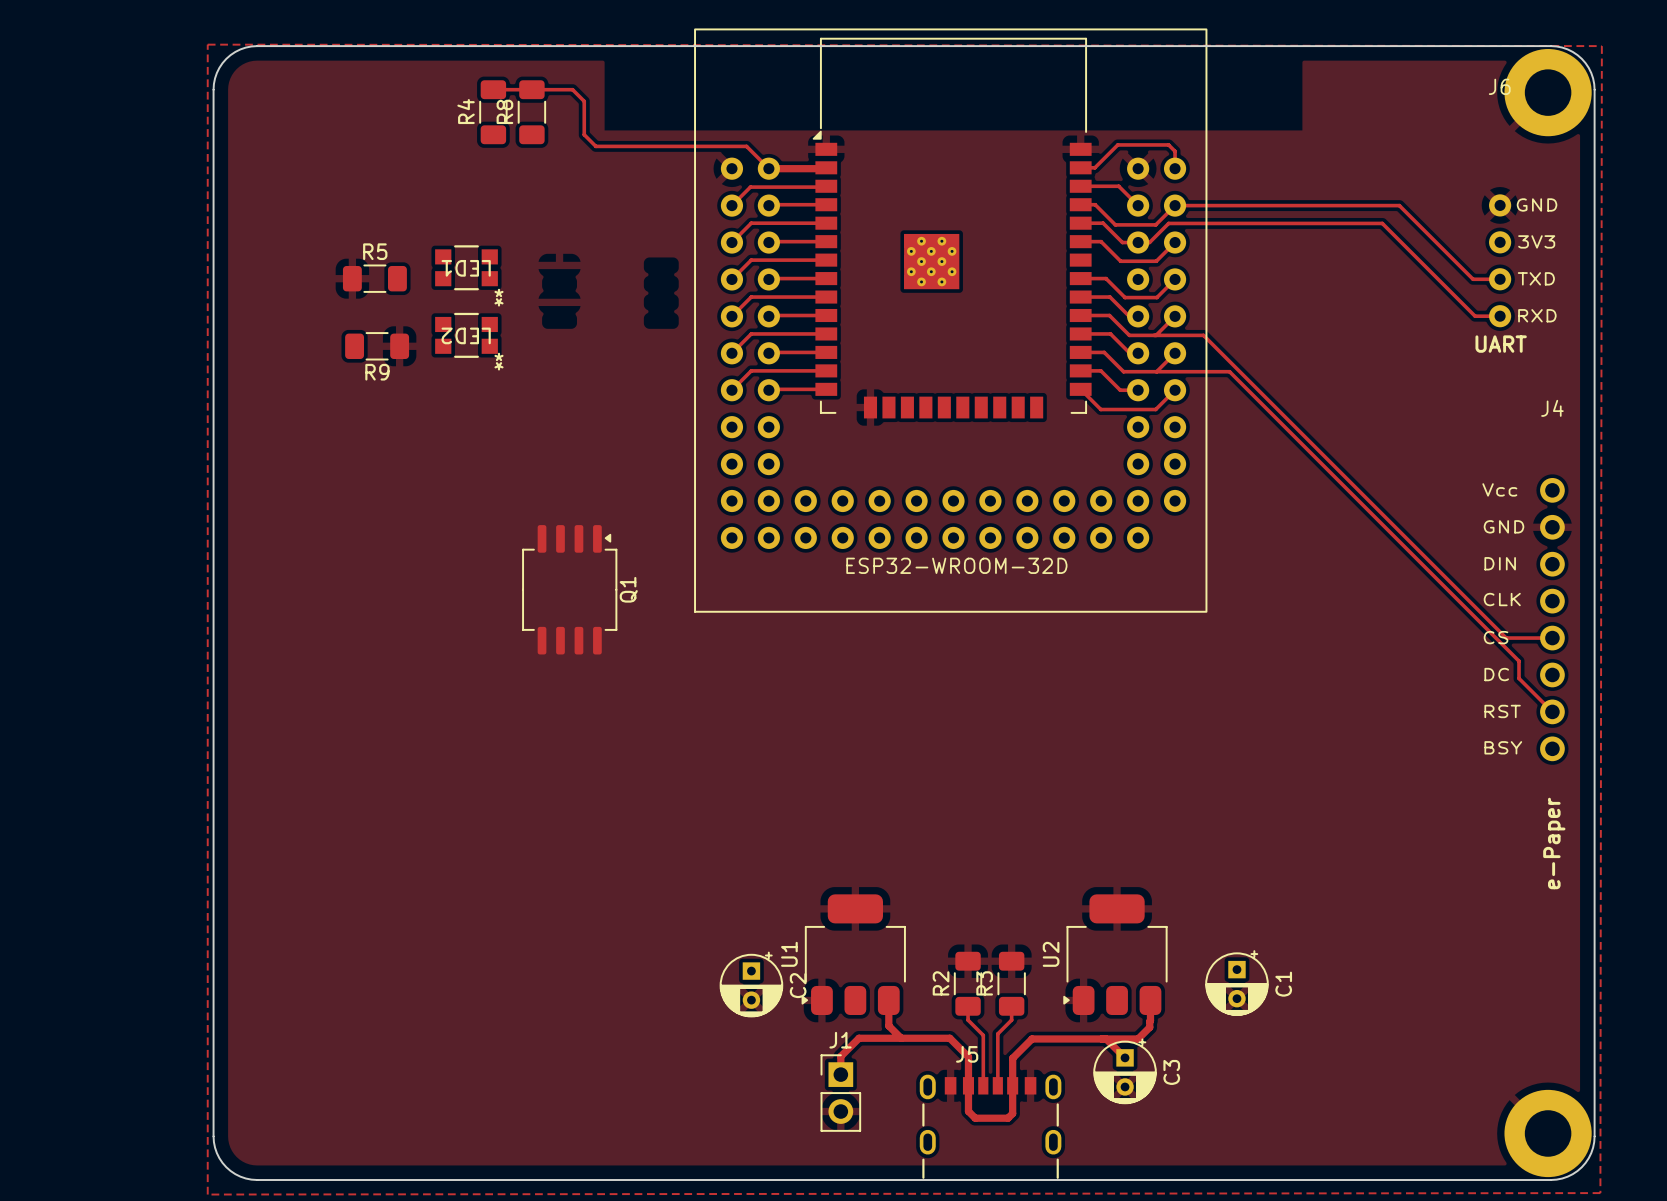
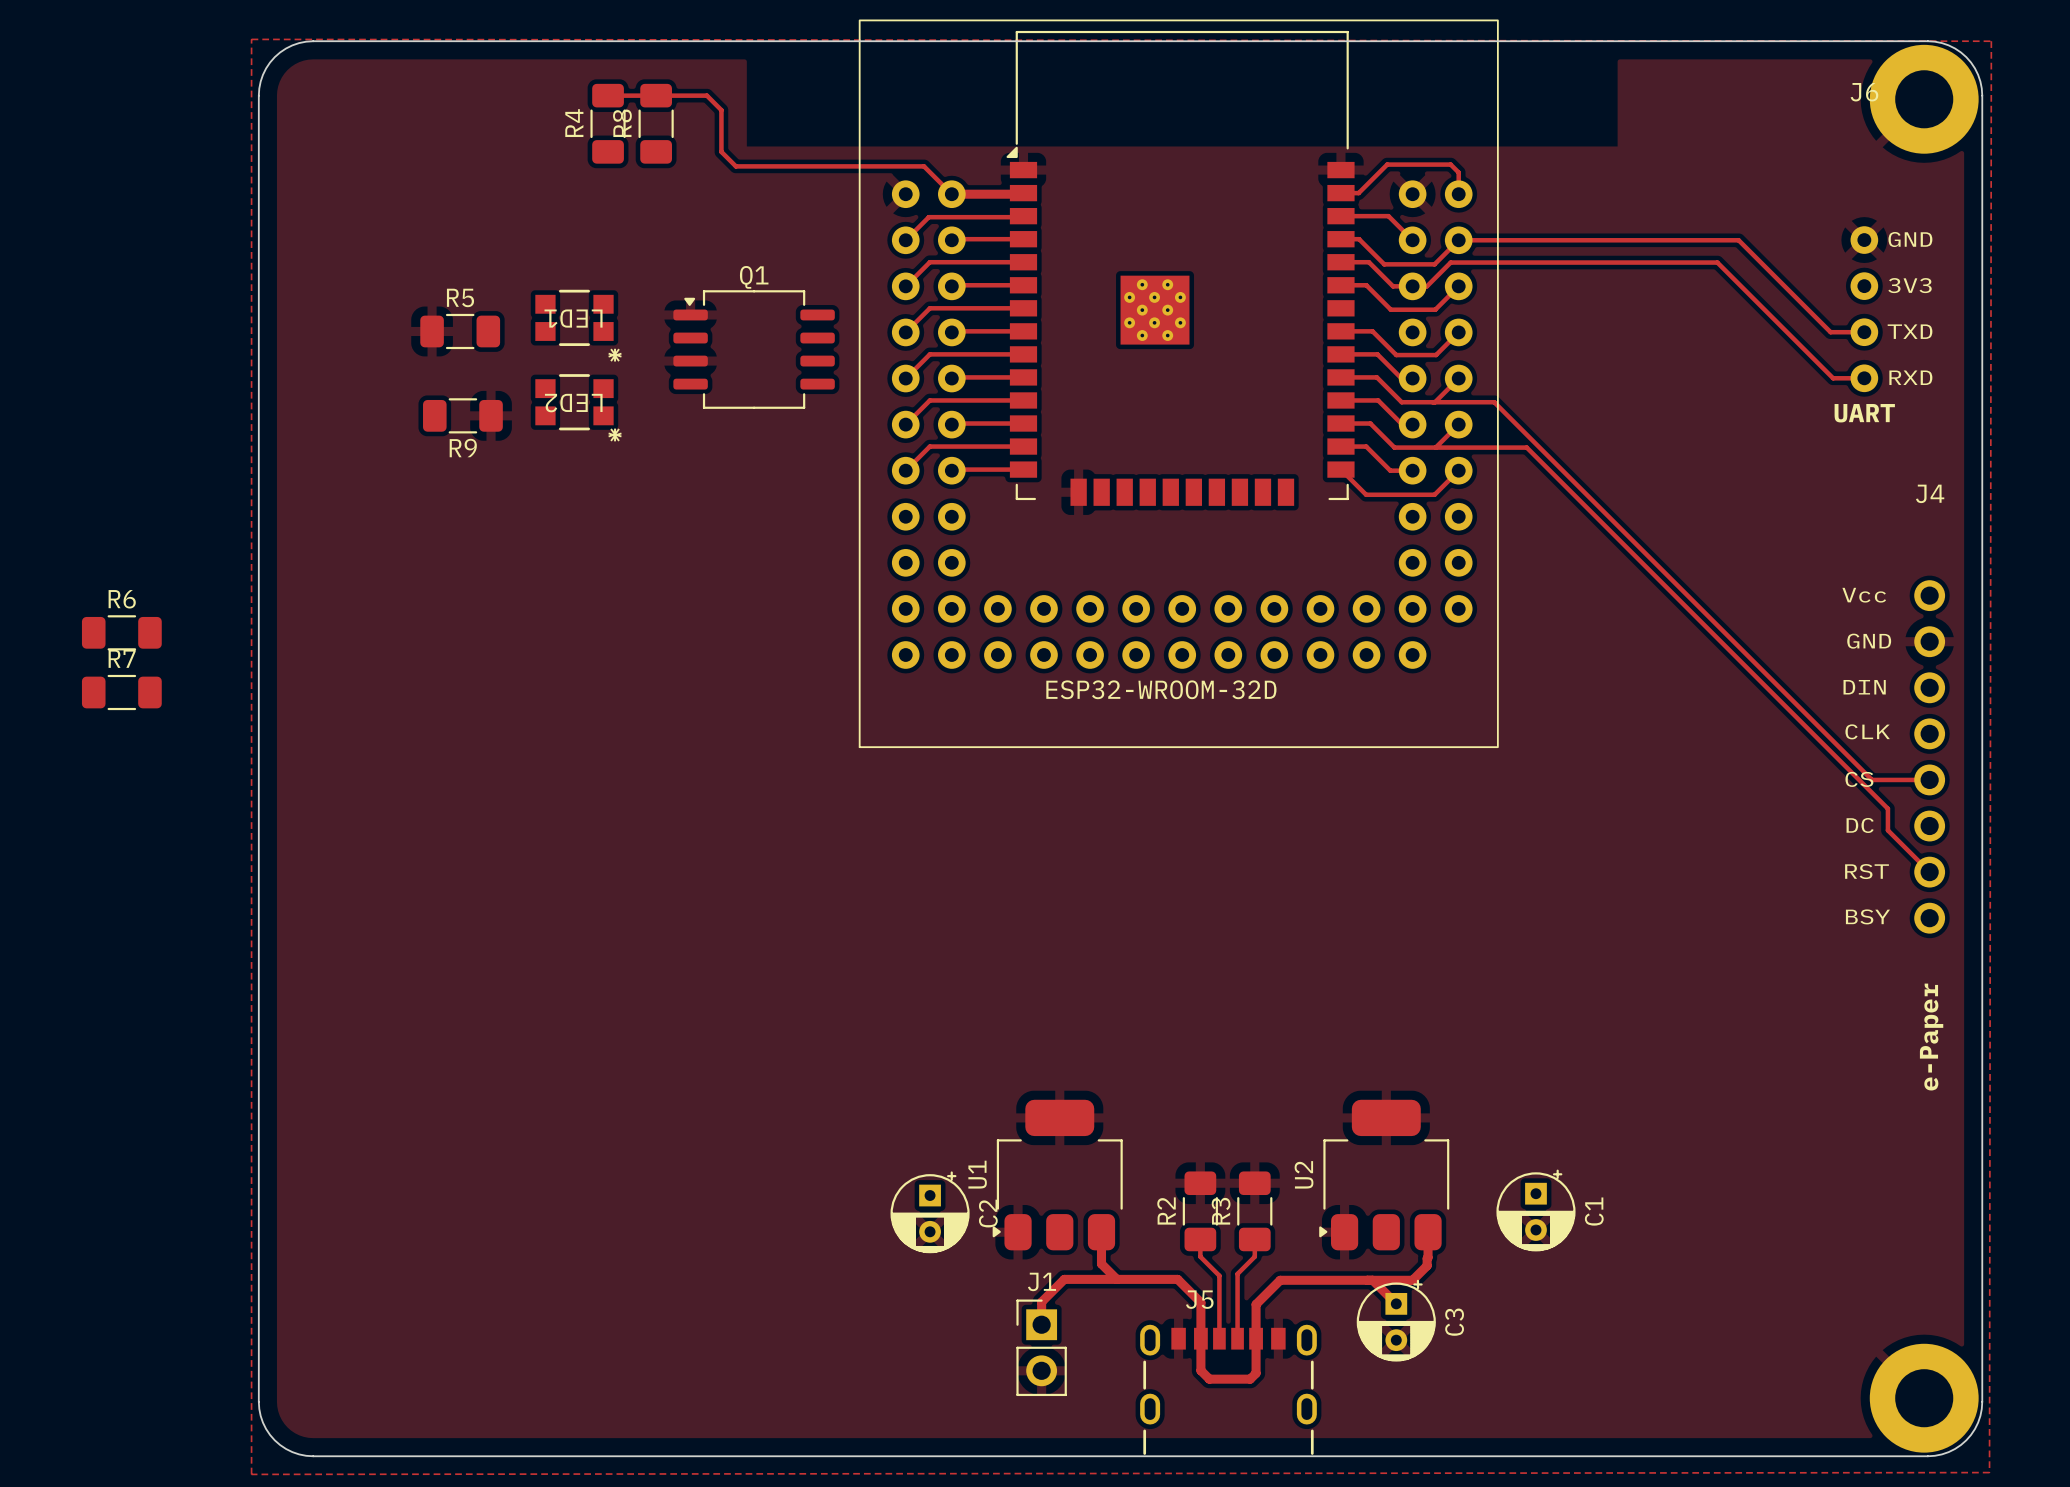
R6: none -> (121, 632)
R7: none -> (121, 692)
Q1 rotation: 0° (569, 589) -> 90° counterclockwise (754, 349)
Q1 position: (569, 589) -> (754, 349)

